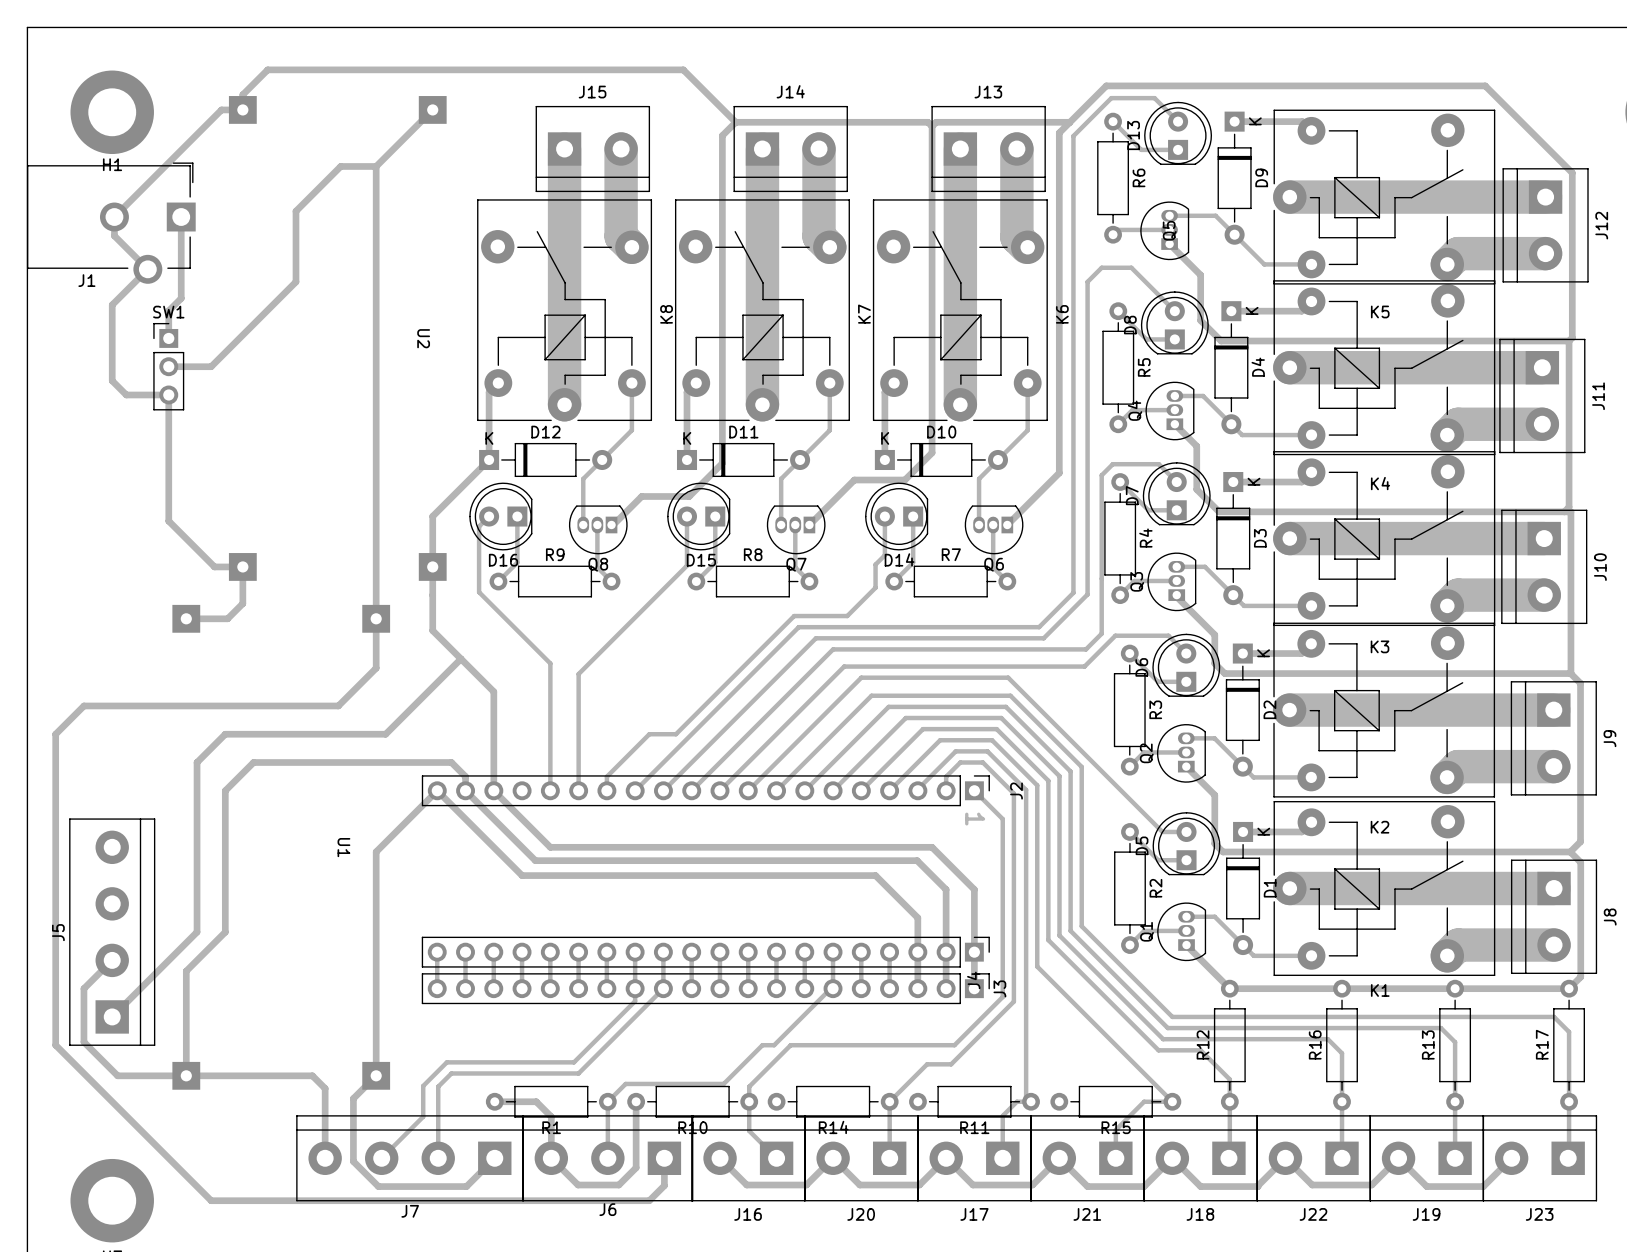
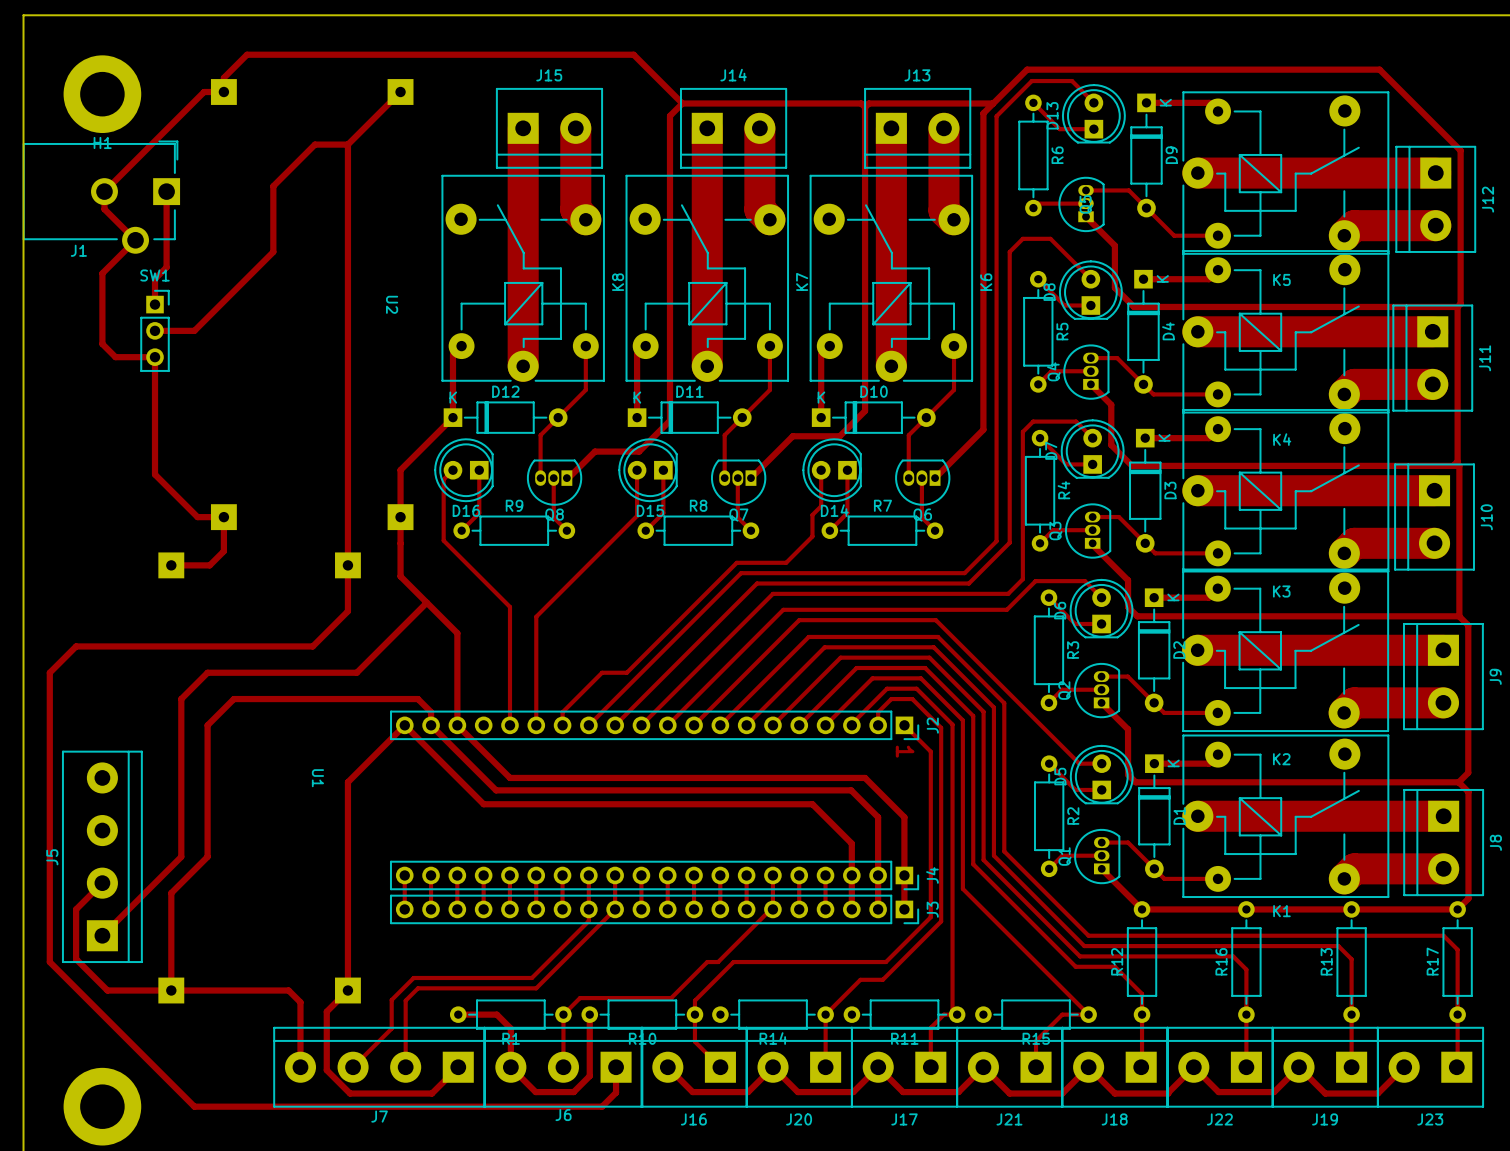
SW1 footprint: [153, 322, 185, 411] -> [140, 290, 170, 372]
J2 footprint: [421, 775, 990, 807] -> [390, 710, 919, 740]
J4 footprint: [421, 936, 990, 968] -> [390, 861, 919, 890]
J3 footprint: [421, 973, 990, 1005] -> [390, 895, 919, 924]
J4 name position: J4 (973, 980) -> J4 (932, 875)

